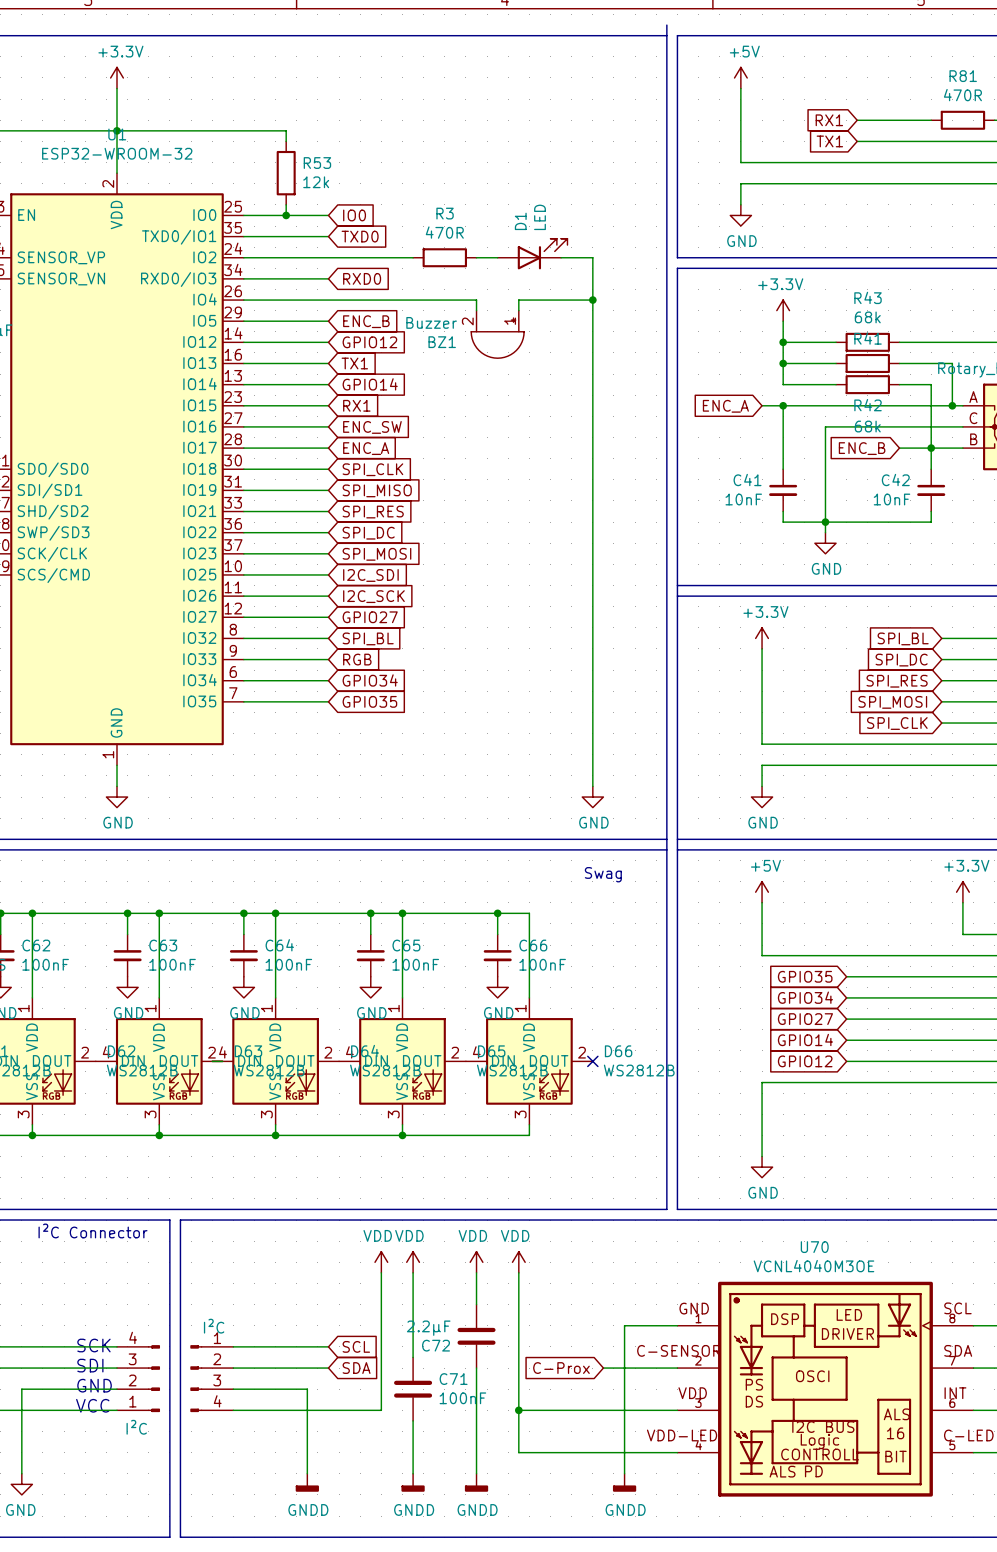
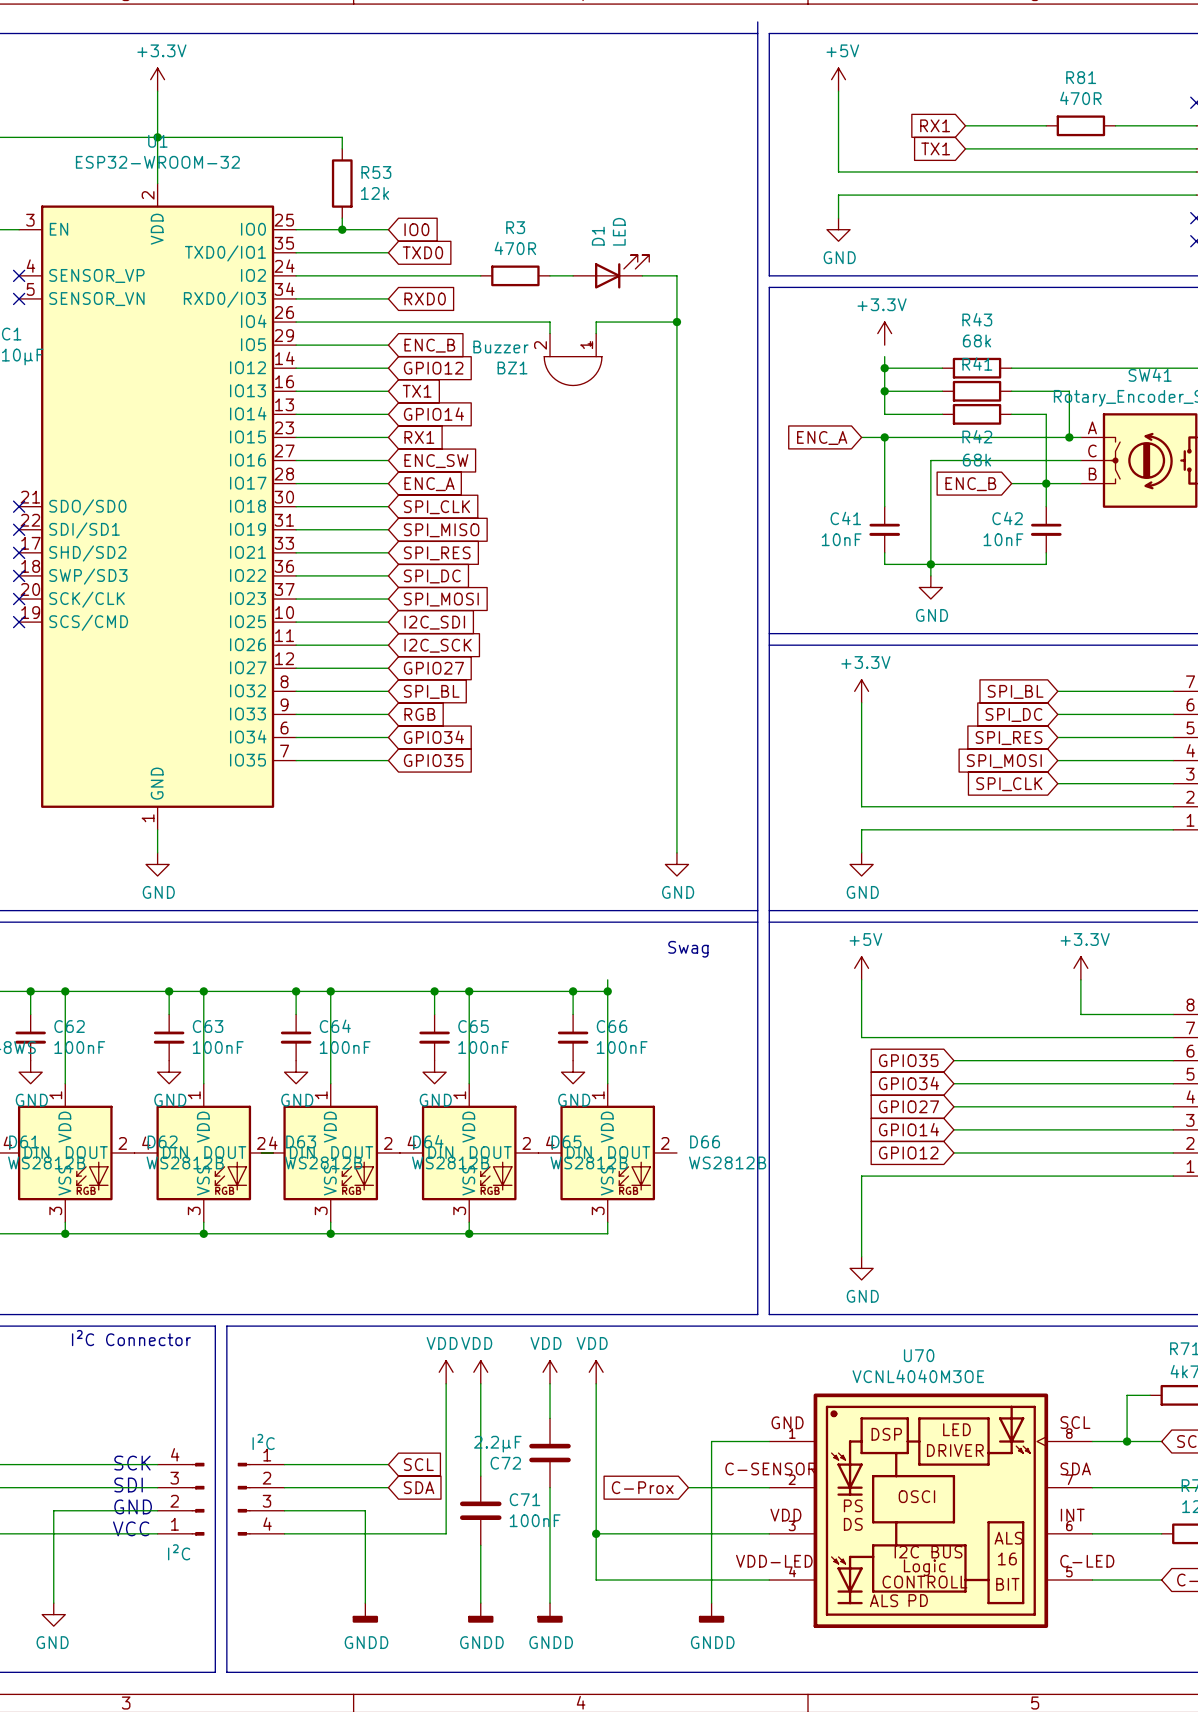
wire: (783, 321) (783, 331) -> none
wire: none -> (607, 979) (607, 991)
junction: none -> (607, 991)
no-connect mark: (592, 1061) -> none

